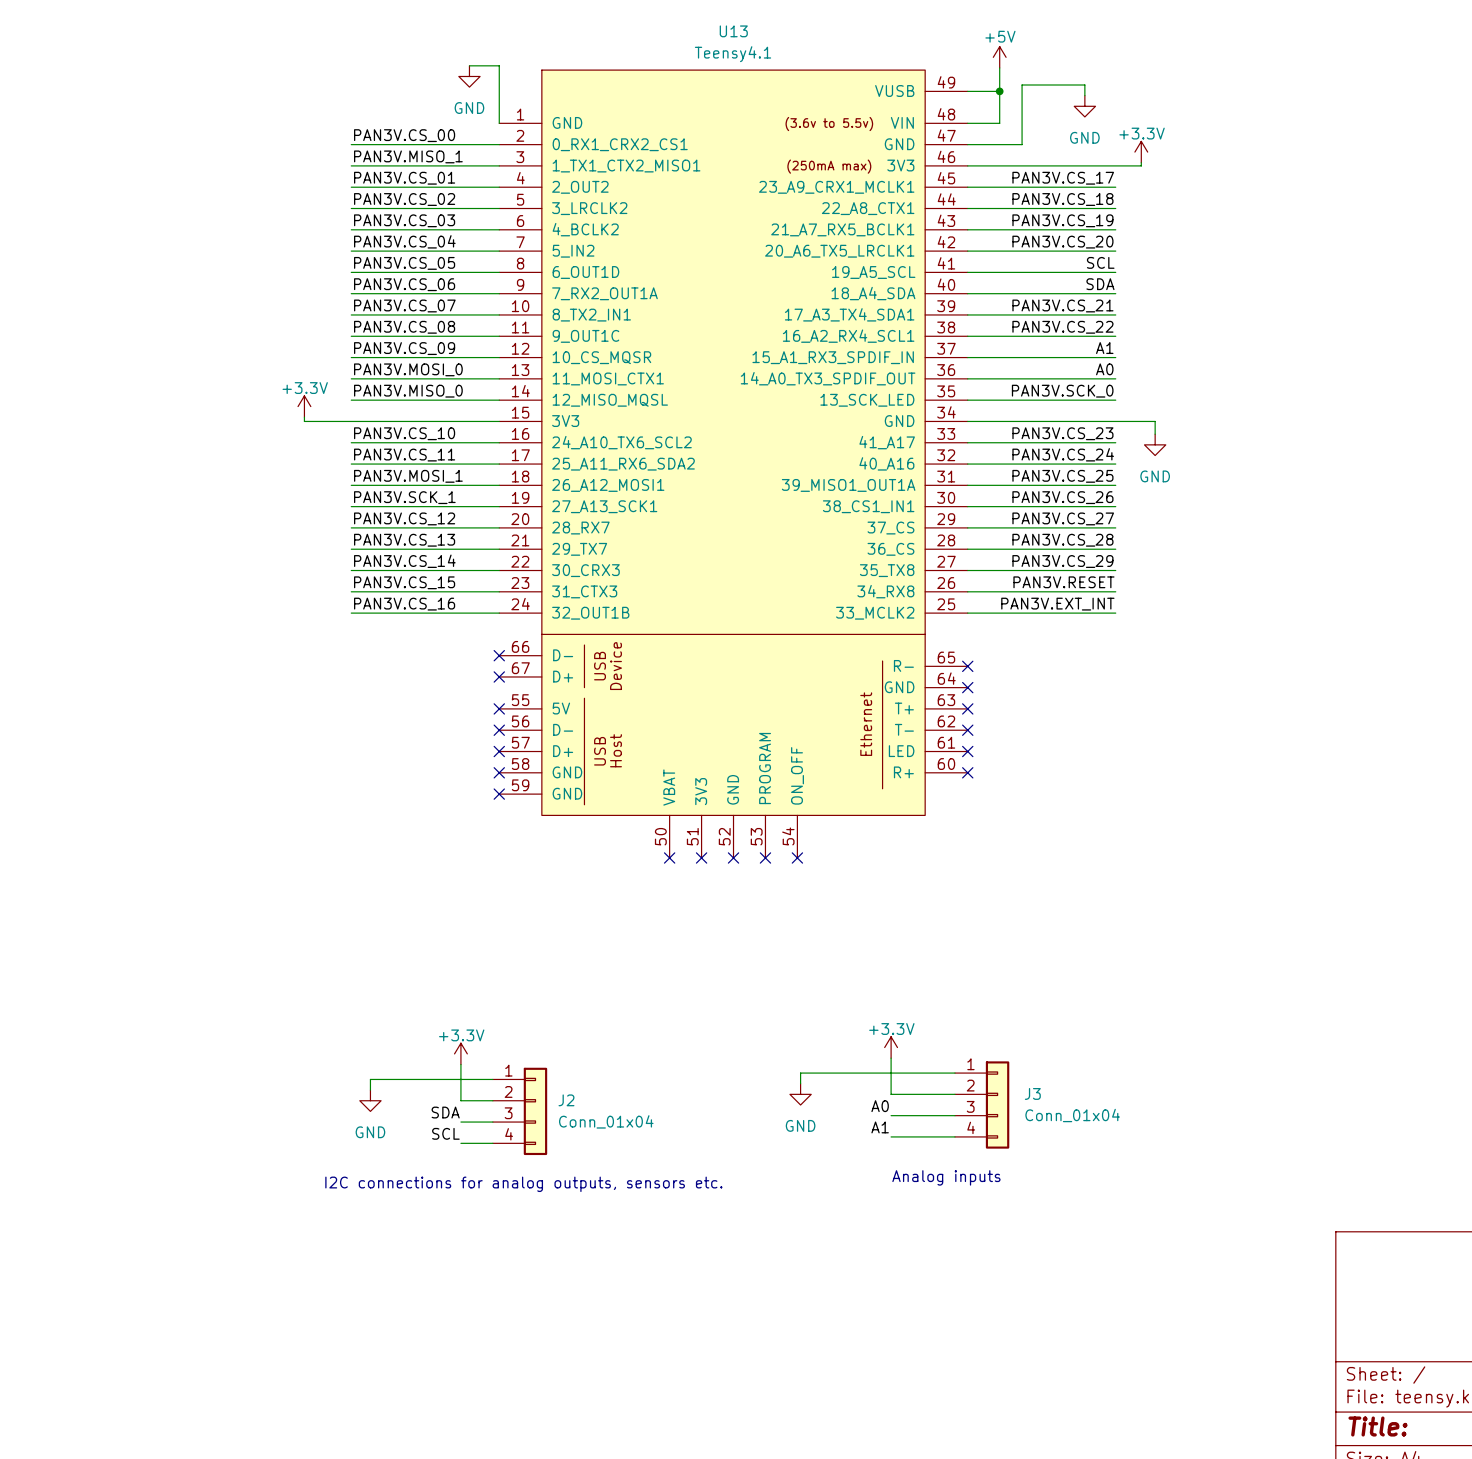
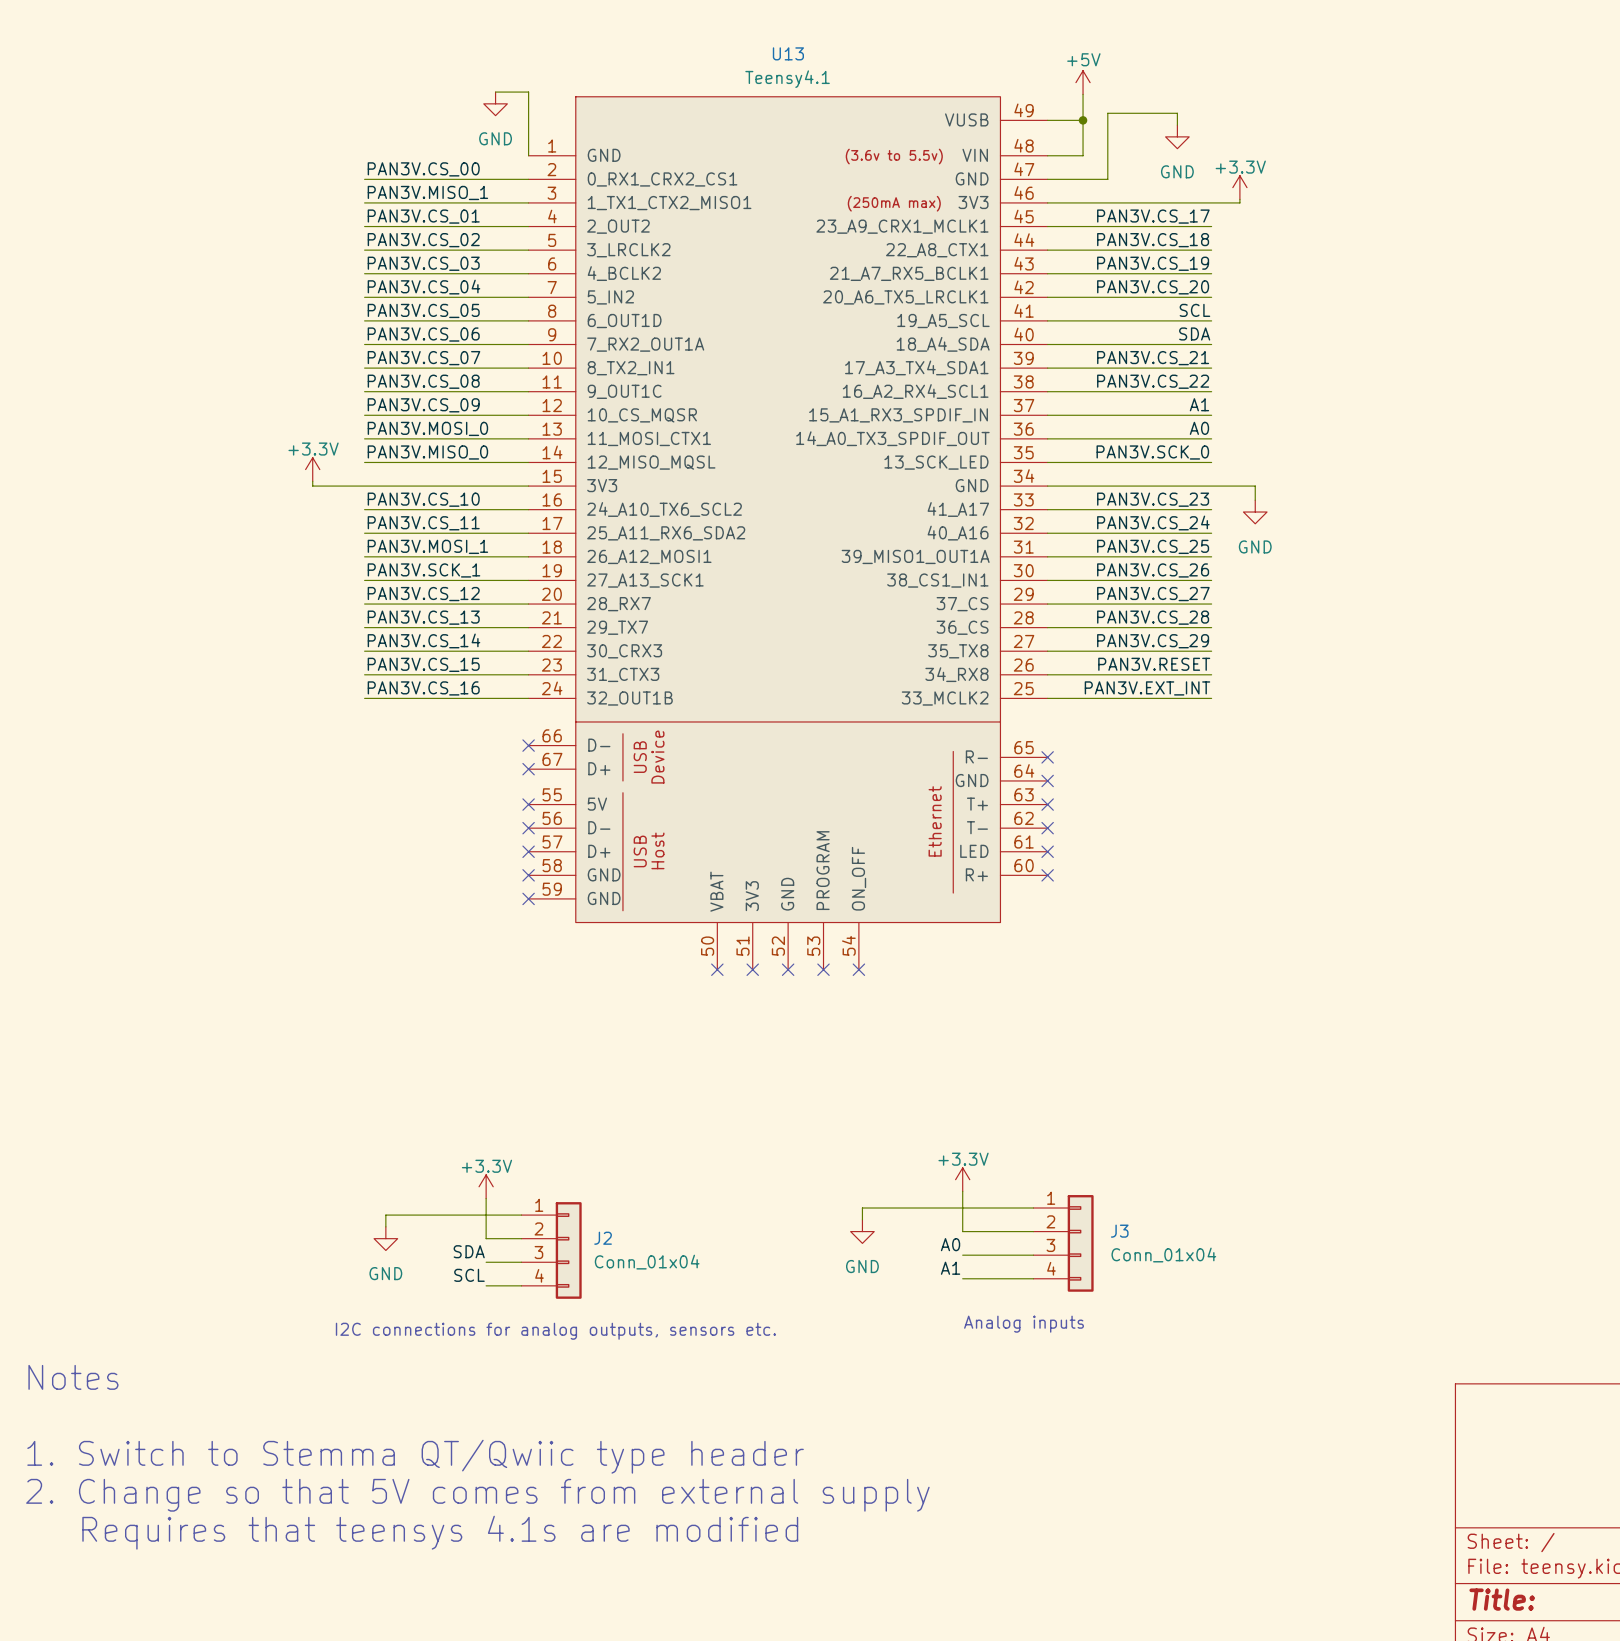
text: none -> Notes (73, 1377)
text: none -> 1. Switch to Stemma QT/Qwiic type header (415, 1456)
text: none -> 2. Change so that 5V comes from external supply (477, 1495)
text: none -> Requires that teensys 4.1s are modified (440, 1532)

